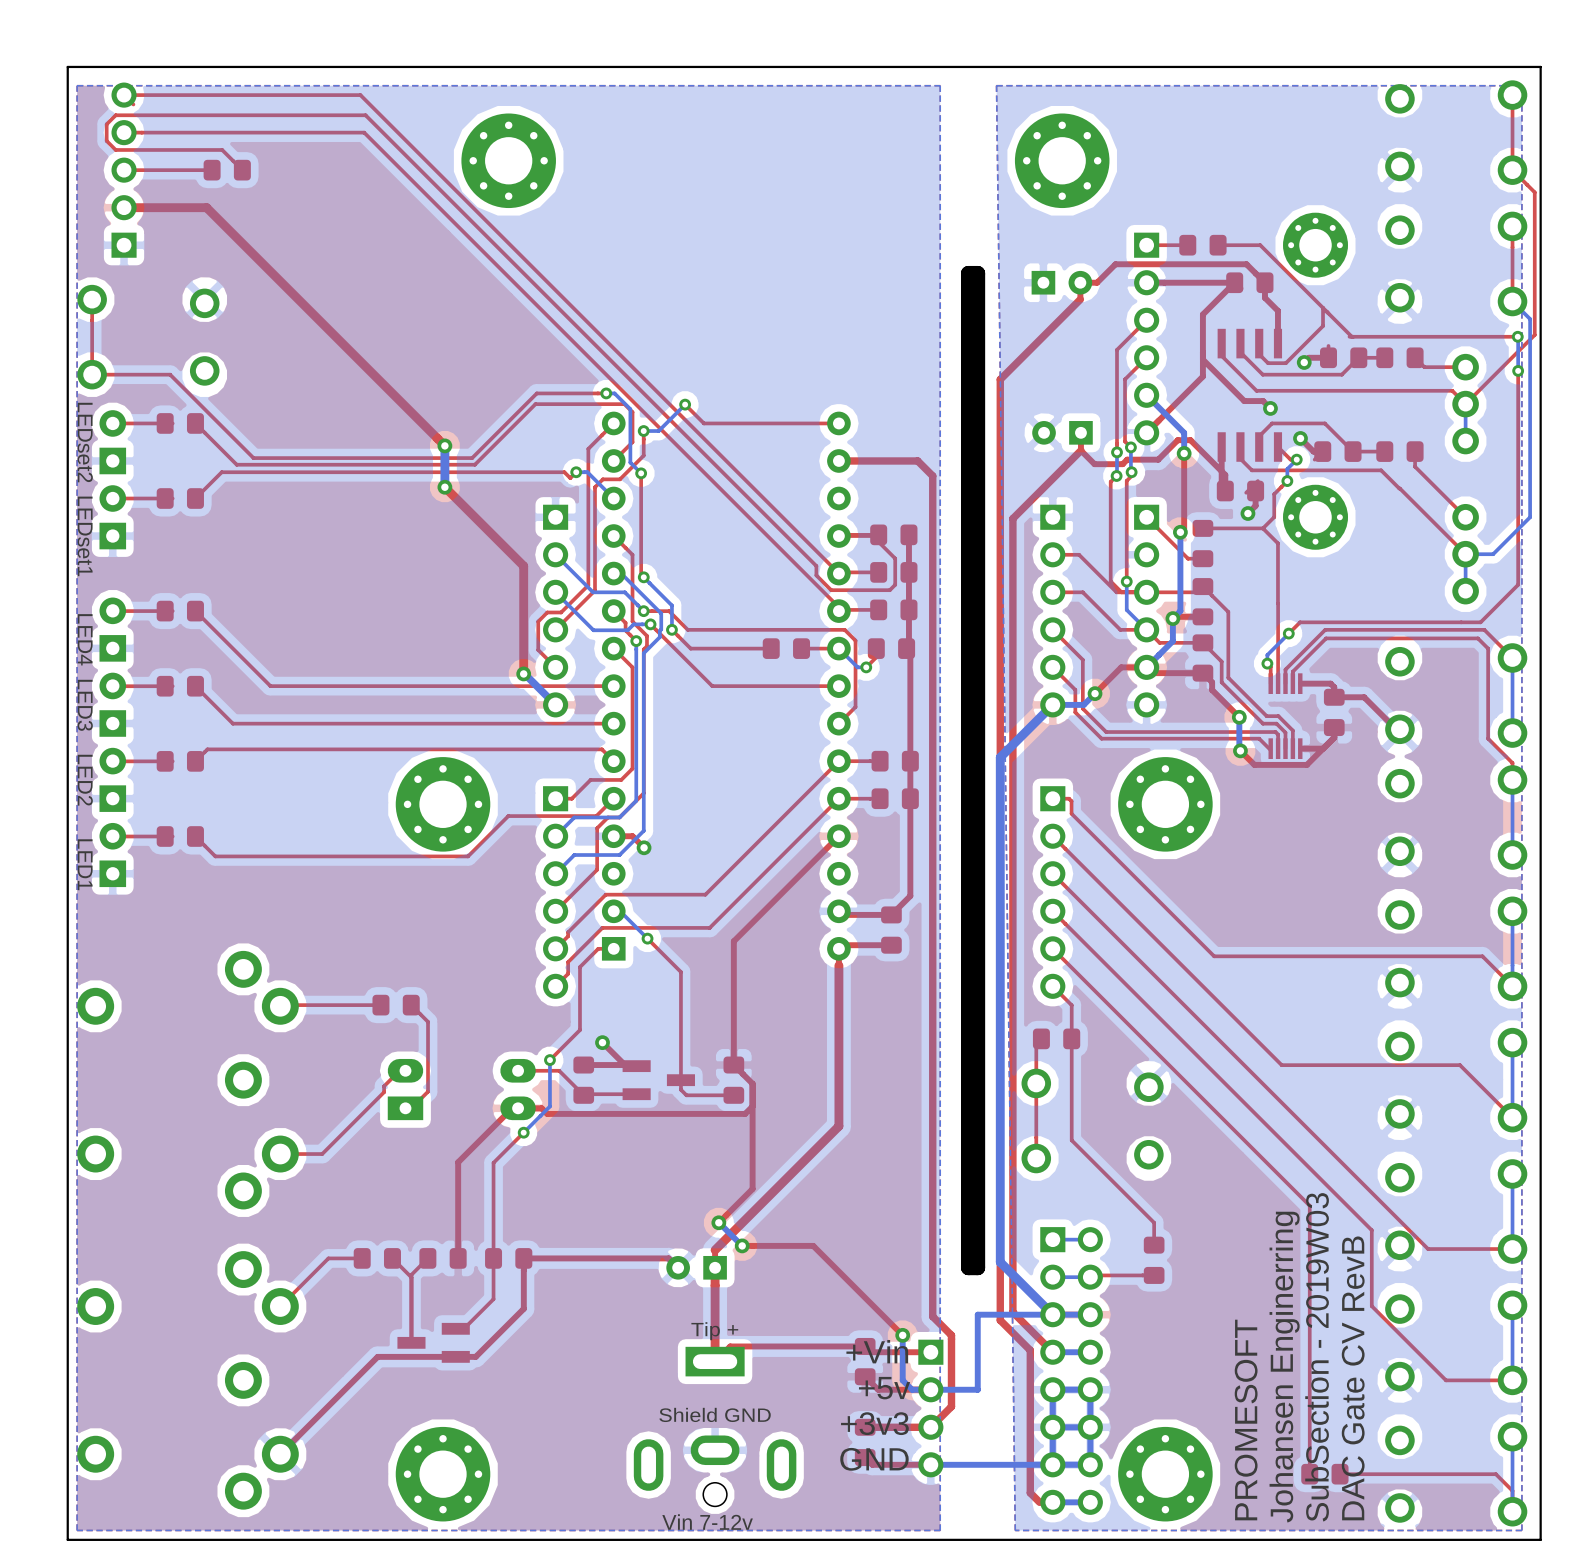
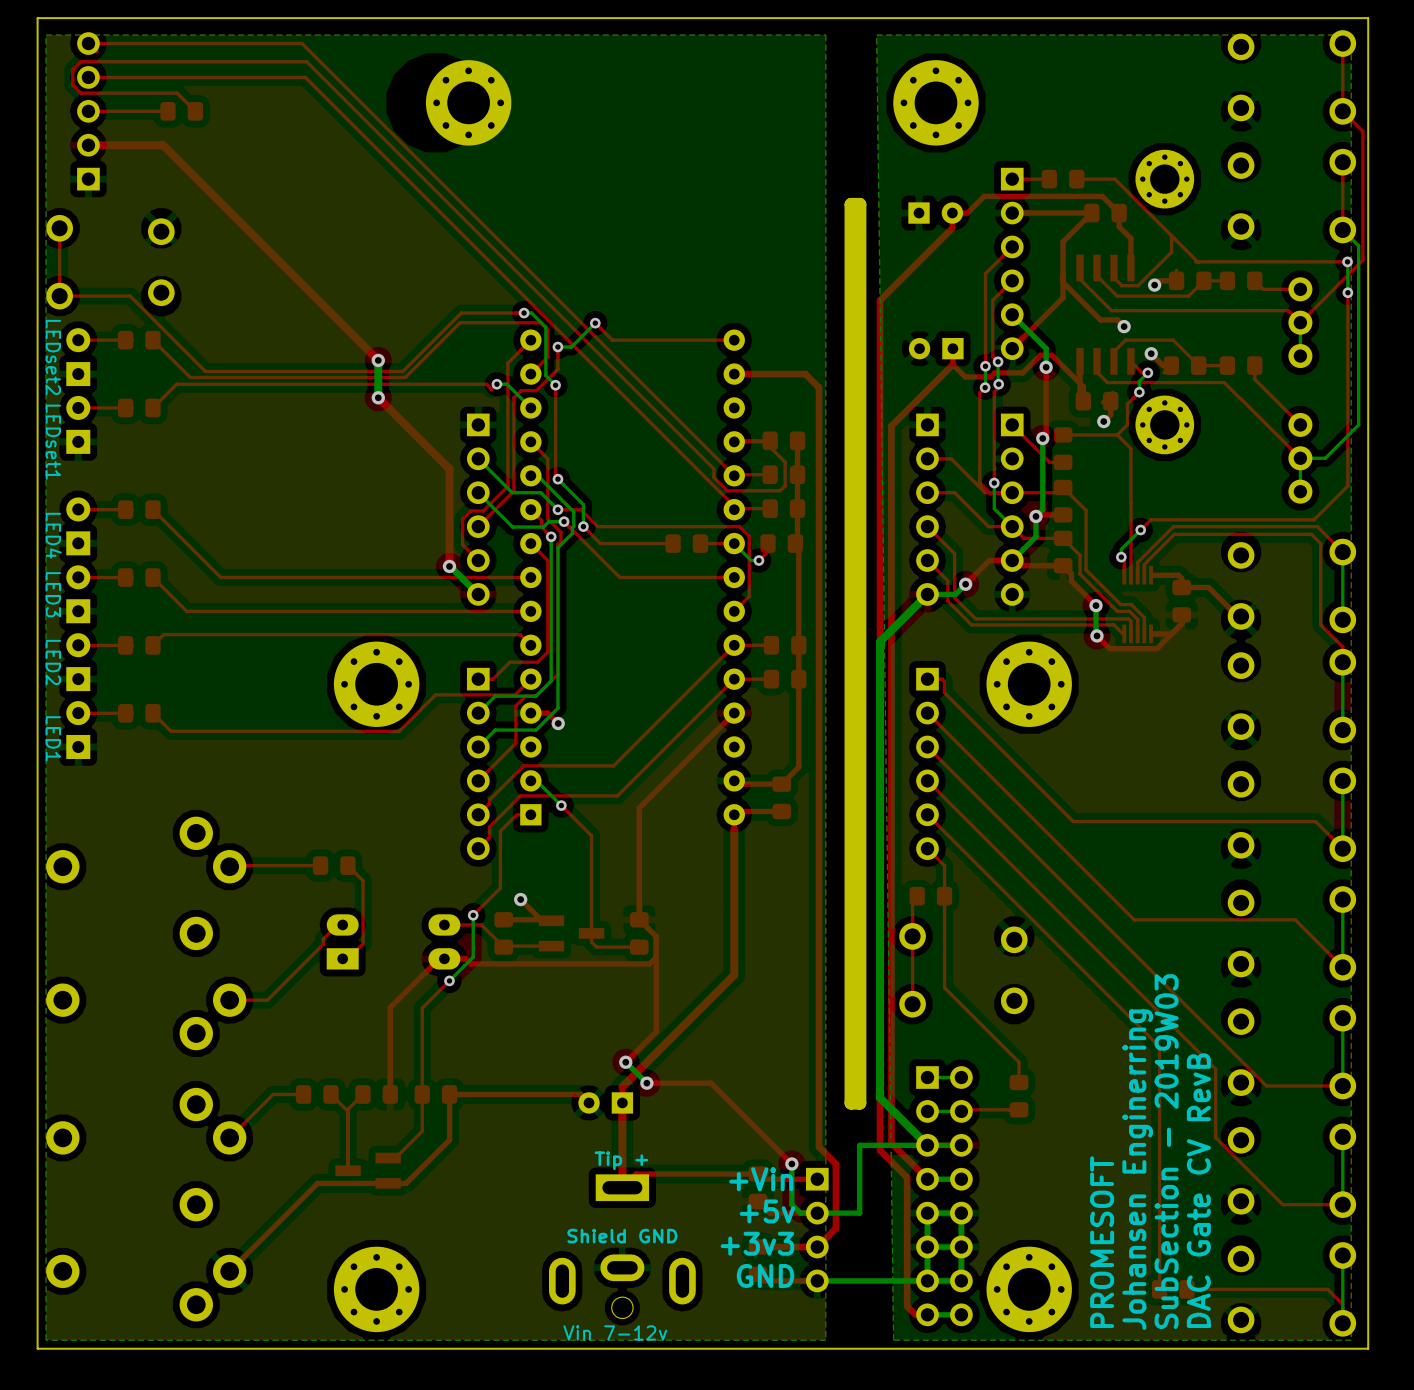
part position: (508, 160) -> (468, 102)

